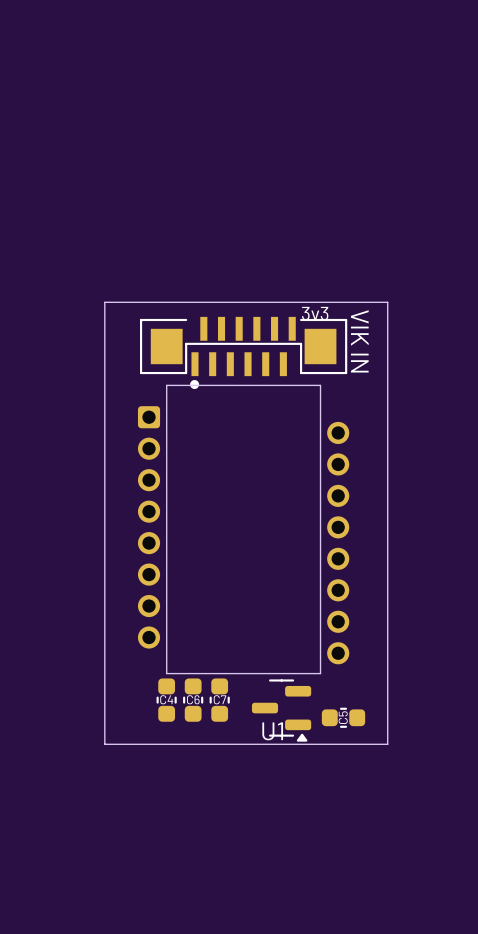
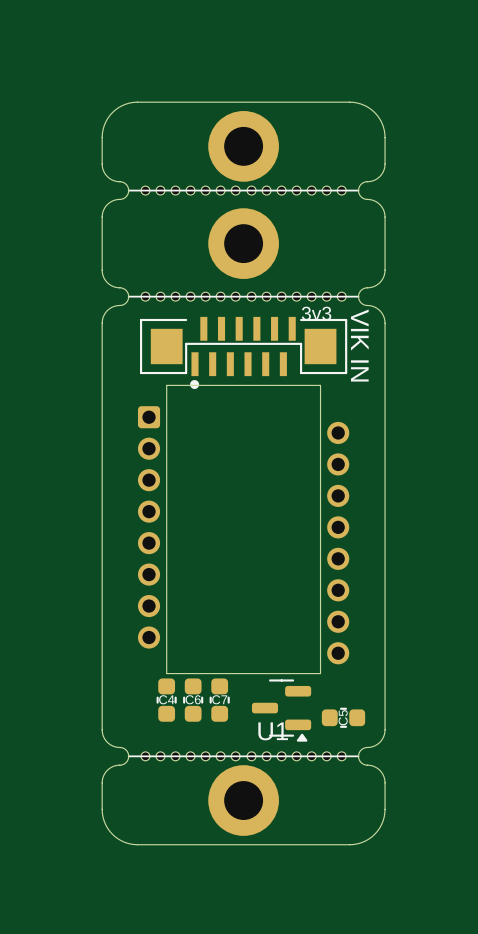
part: none -> (243, 146)
line: none -> (128, 190) (358, 190)
part: none -> (190, 190)
part: none -> (296, 190)
part: none -> (243, 243)
line: none -> (128, 296) (358, 296)
part: none -> (190, 296)
part: none -> (296, 296)
board edge: (104, 302) (387, 302) (387, 744) (104, 744) (104, 302) -> (137, 102) (125, 104) (112, 112) (104, 125) (102, 137) (103, 171) (110, 179) (125, 183) (128, 190) (124, 198) (114, 200) (107, 204) (102, 217) (103, 275) (110, 285) (125, 289) (128, 296) (124, 304) (114, 306) (107, 310) (102, 323) (102, 731) (107, 742) (114, 746) (124, 748) (128, 756) (125, 763) (110, 767) (103, 777) (102, 809) (104, 821) (115, 837) (133, 844) (349, 844) (361, 842) (377, 831) (383, 821) (385, 809) (383, 775) (376, 767) (361, 763) (358, 756) (362, 748) (373, 746) (379, 742) (385, 729) (384, 321) (379, 310) (373, 306) (362, 304) (358, 296) (362, 288) (373, 286) (379, 282) (384, 272) (384, 211) (376, 202) (361, 197) (358, 190) (361, 183) (376, 179) (384, 169) (385, 137) (383, 125) (371, 109) (353, 102) (137, 102)
line: none -> (128, 756) (358, 756)
part: none -> (190, 756)
part: none -> (296, 756)
part: none -> (243, 800)

